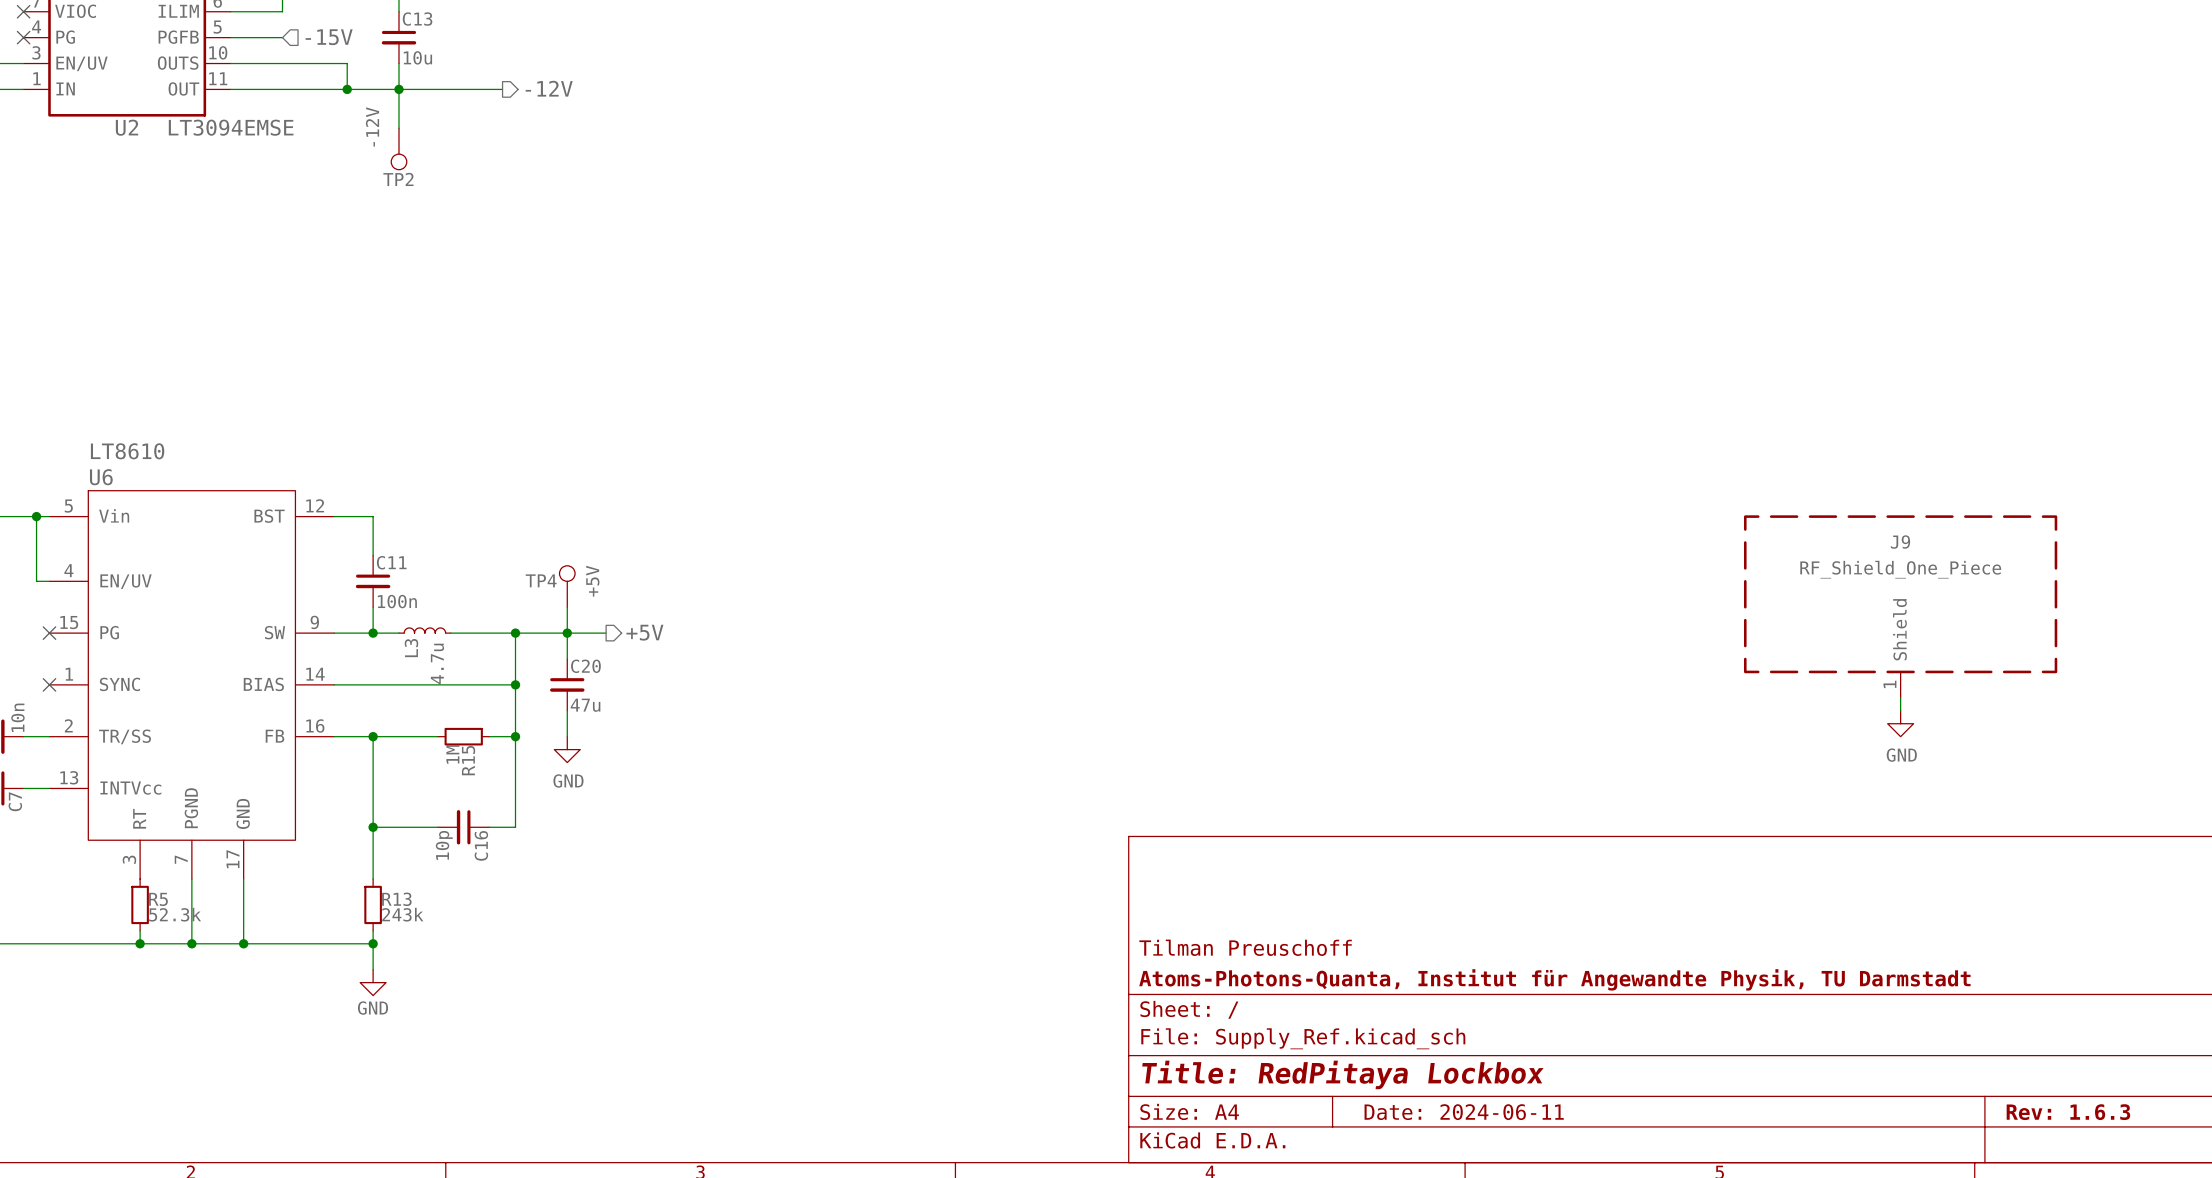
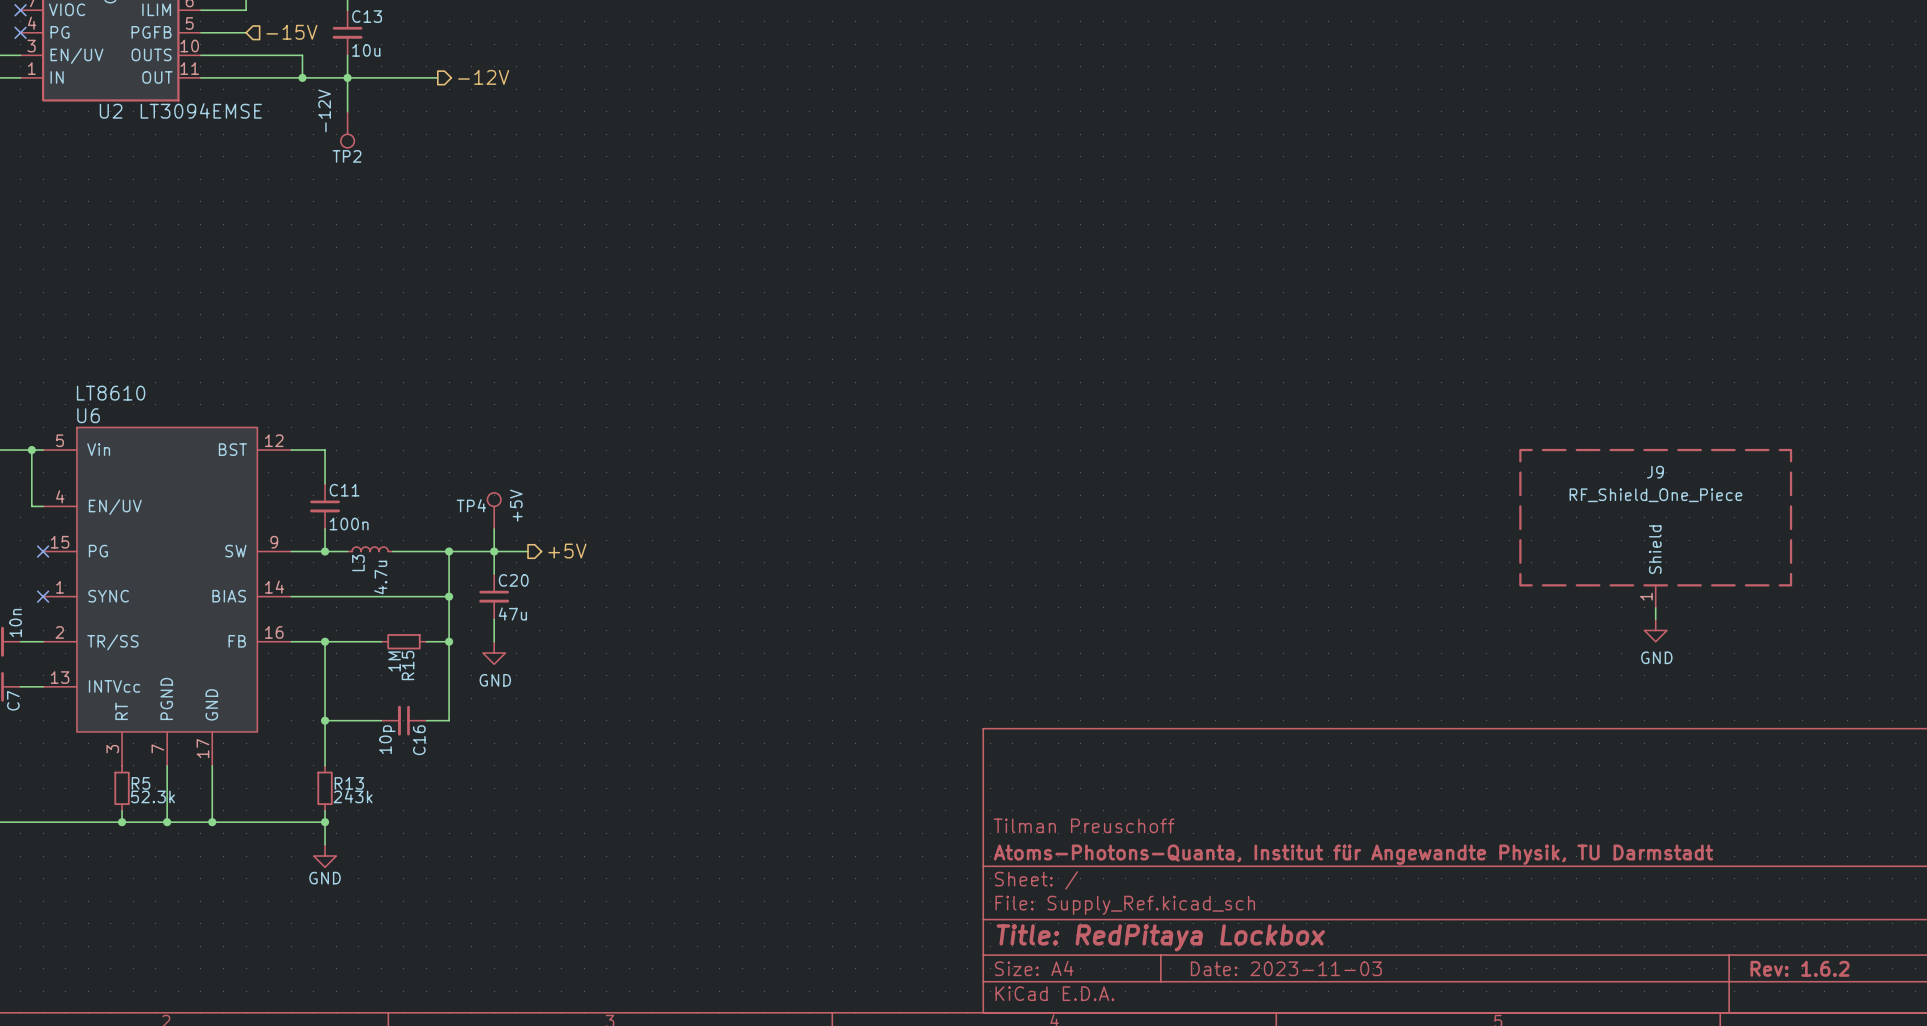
title block: Date: 2024-06-11 (1464, 1112) -> Date: 2023-11-03 (1286, 968)
title block: Rev: 1.6.3 (2068, 1112) -> Rev: 1.6.2 (1800, 968)

